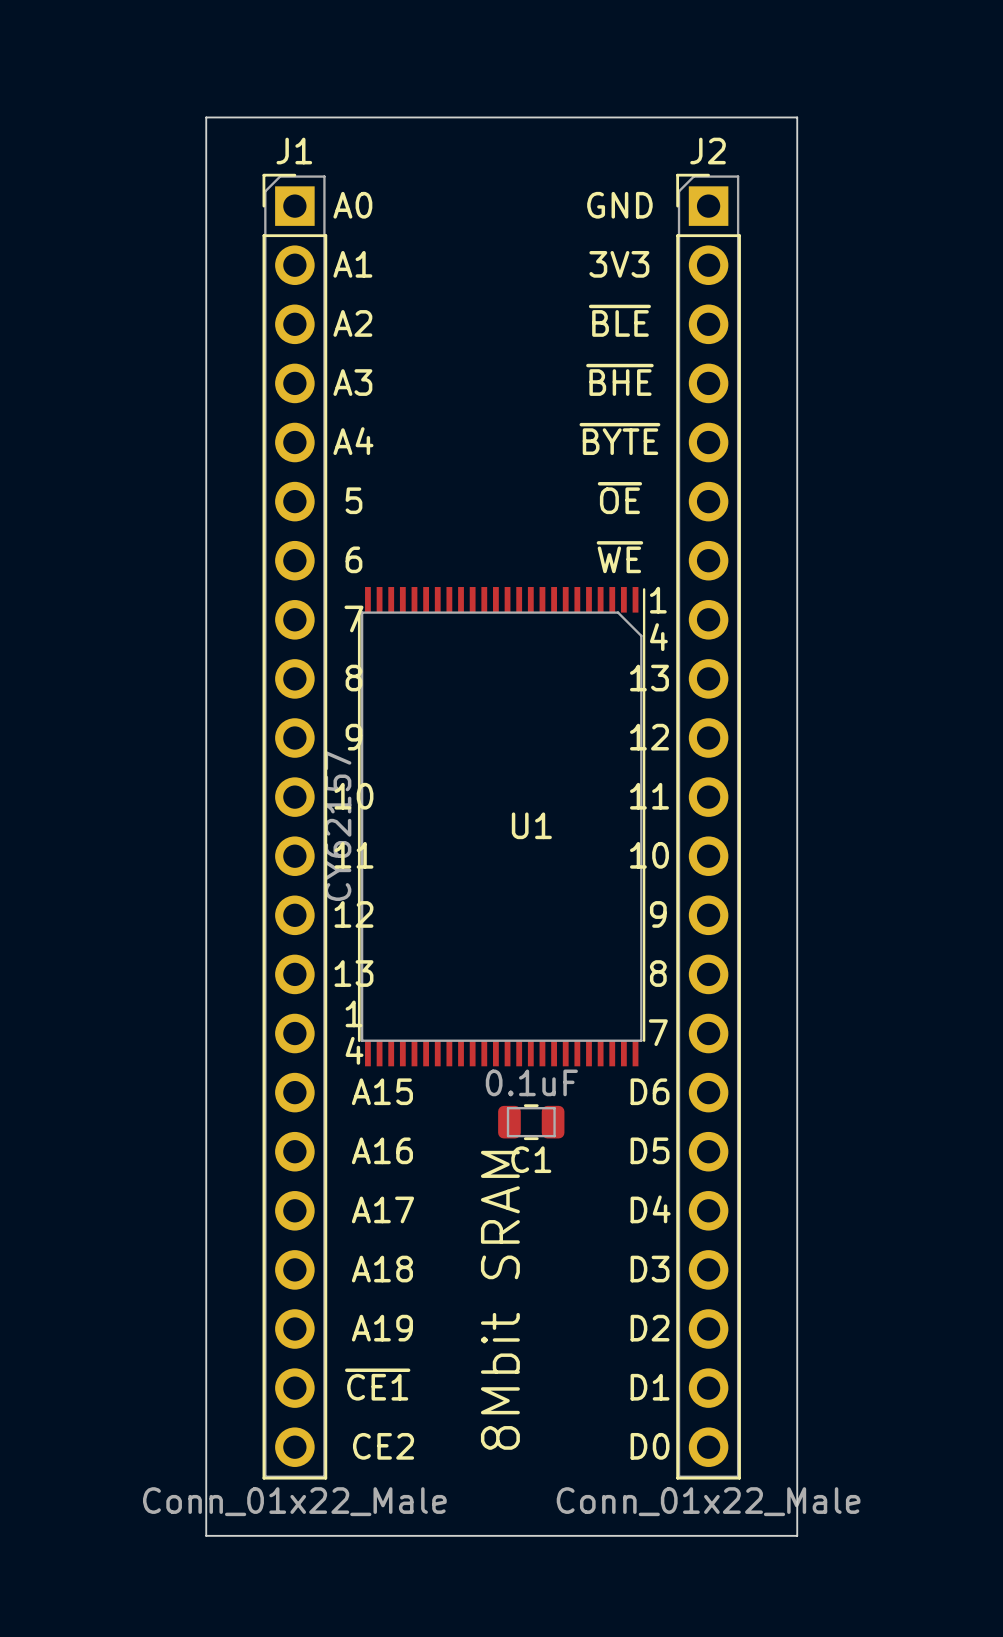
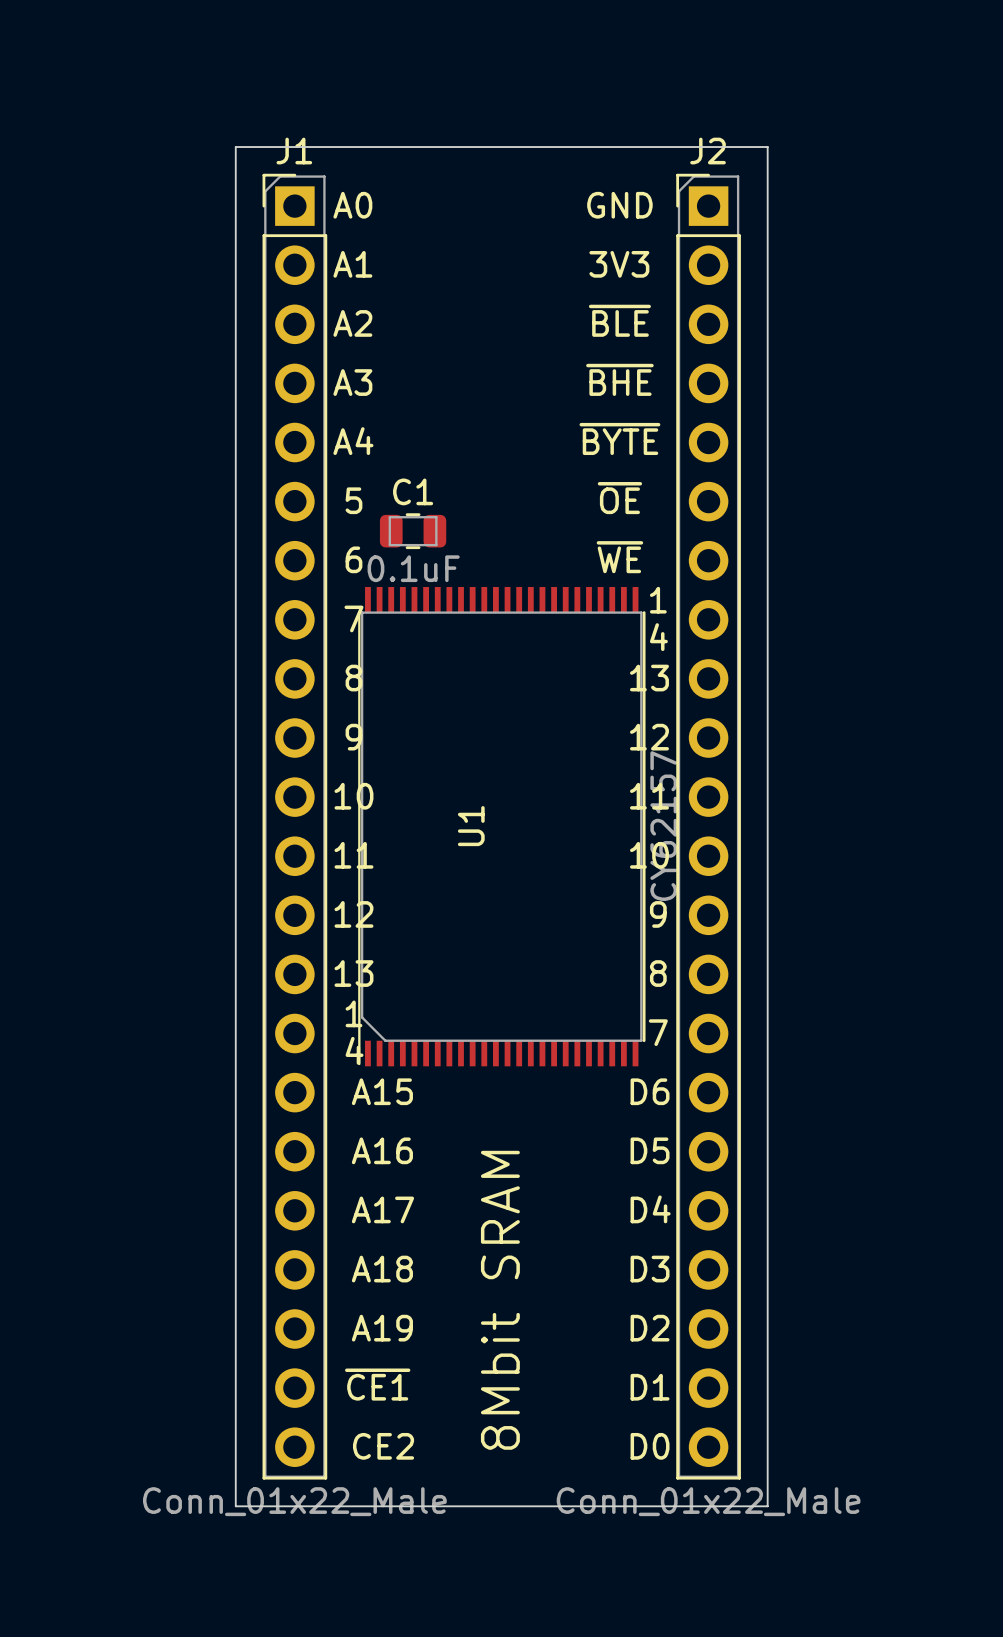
board edge: (206, 117) (206, 1535) (797, 1535) (797, 117) (206, 117) -> (235, 147) (235, 1506) (767, 1506) (767, 147) (235, 147)
U1 rotation: 0° (501, 826) -> 180° (501, 826)
C1 value position: 0.1uF (531, 1082) -> 0.1uF (413, 568)
C1 position: (531, 1122) -> (413, 531)
C1 name position: C1 (531, 1159) -> C1 (413, 491)

